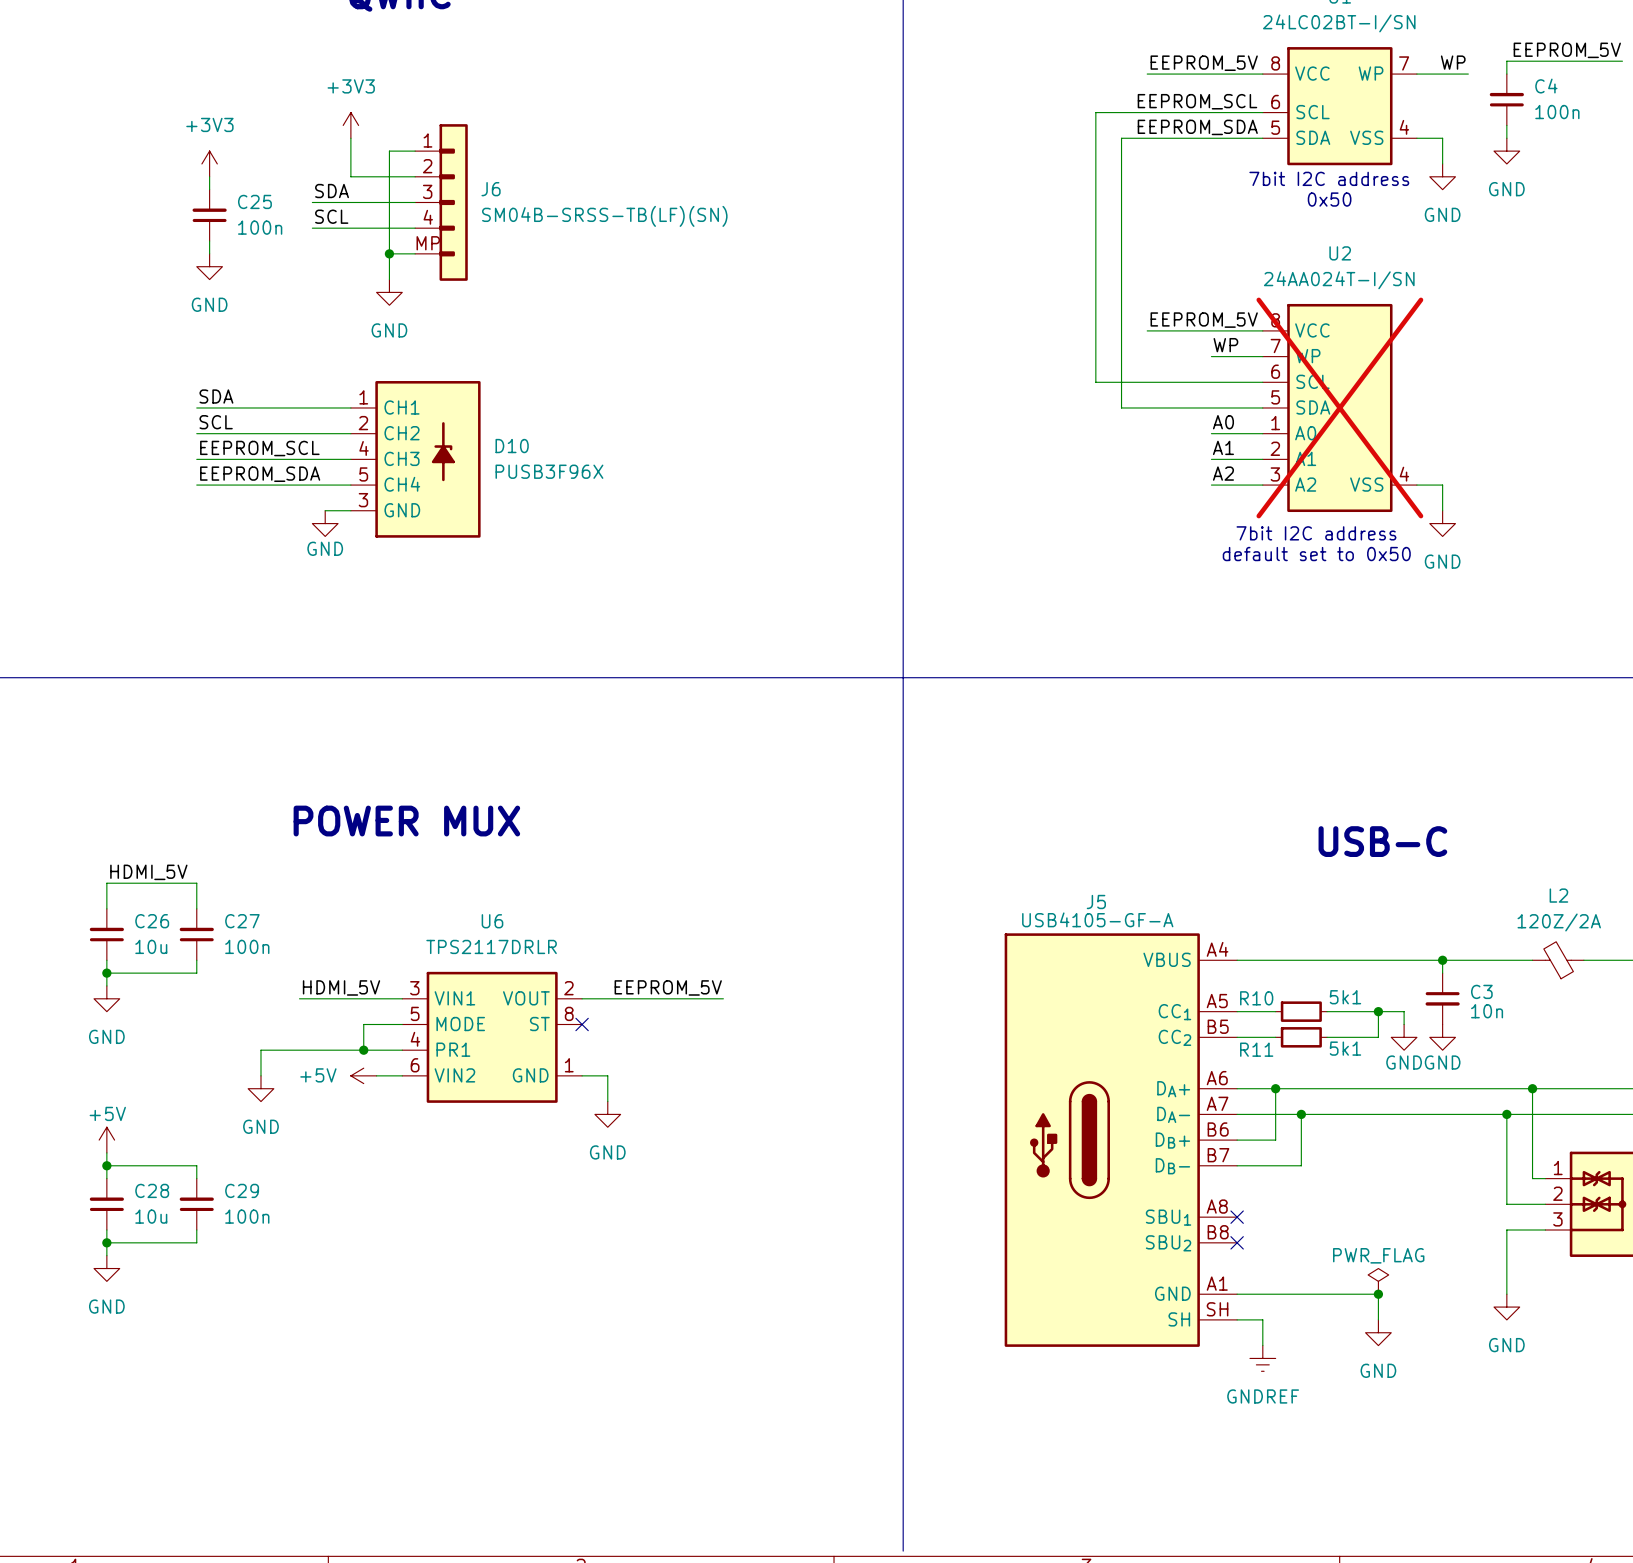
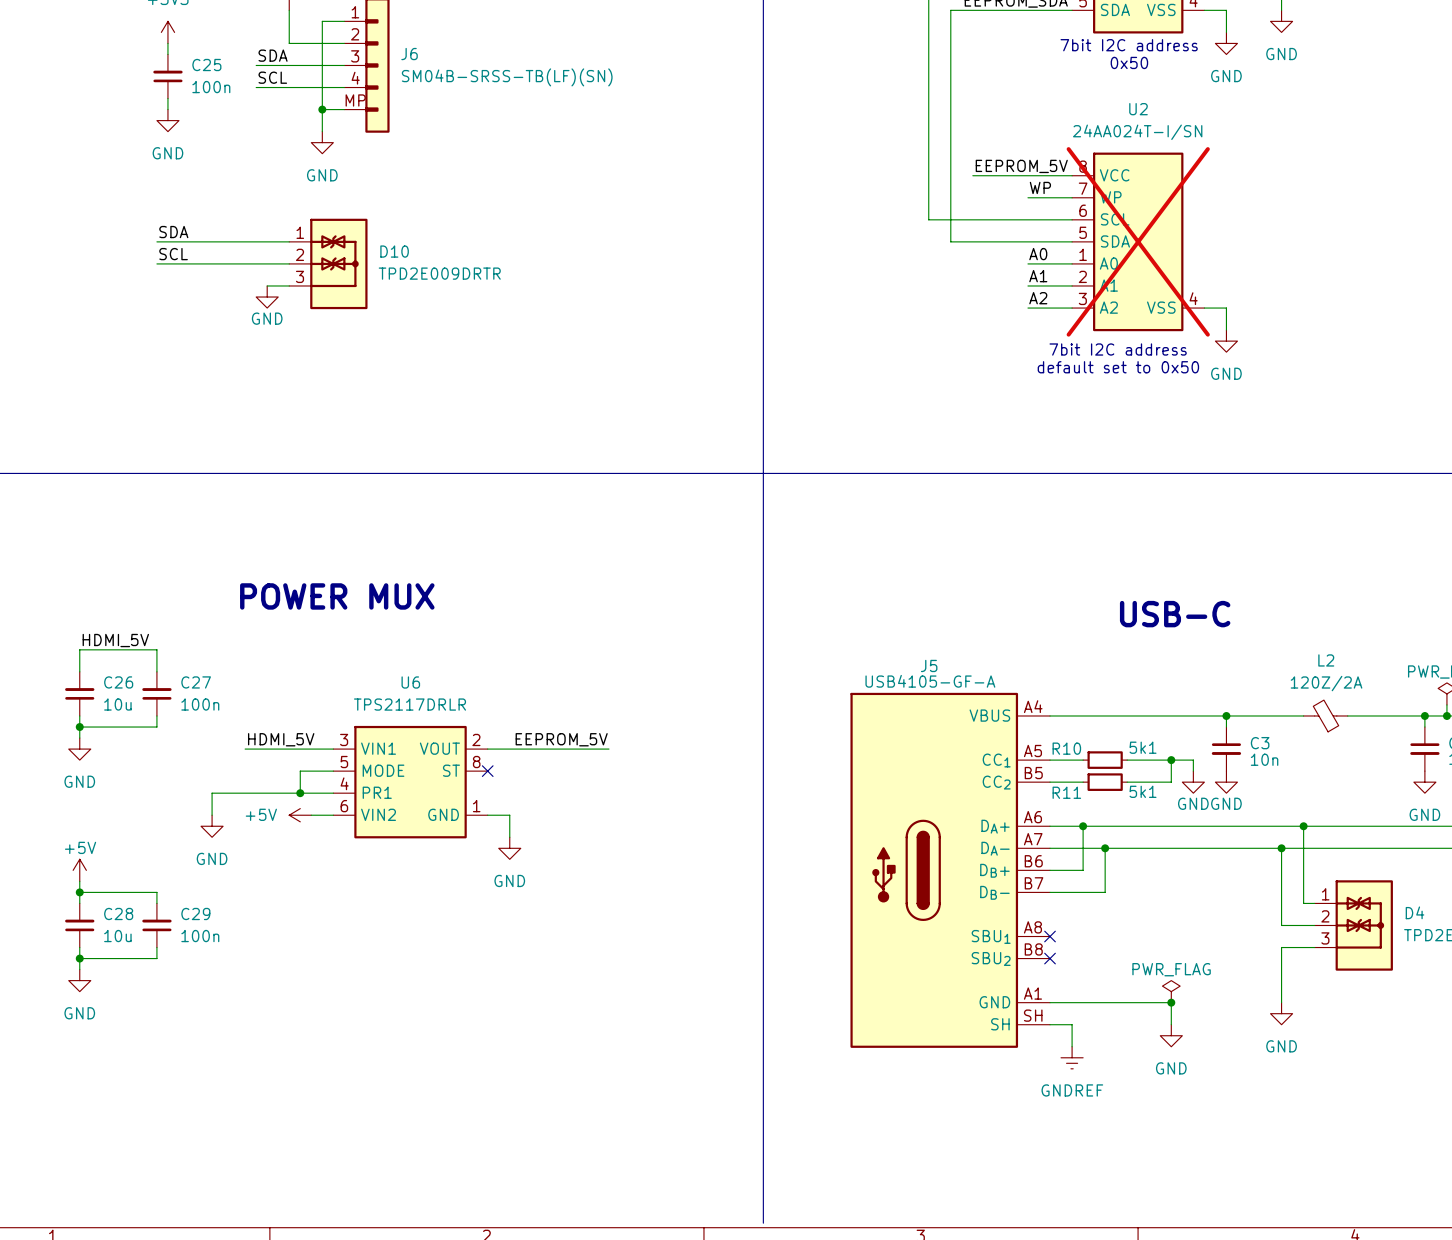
D10 symbol: [350, 381, 481, 538] -> [289, 218, 368, 310]
label: EEPROM_SCL (259, 448) -> none
wire: (196, 459) (325, 459) -> none
D10 text: PUSB3F96X (549, 471) -> TPD2E009DRTR (439, 273)
label: EEPROM_SDA (260, 474) -> none
wire: (196, 485) (350, 485) -> none
wire: (325, 510) (350, 510) -> none
power symbol position: GND (325, 523) -> GND (267, 297)

